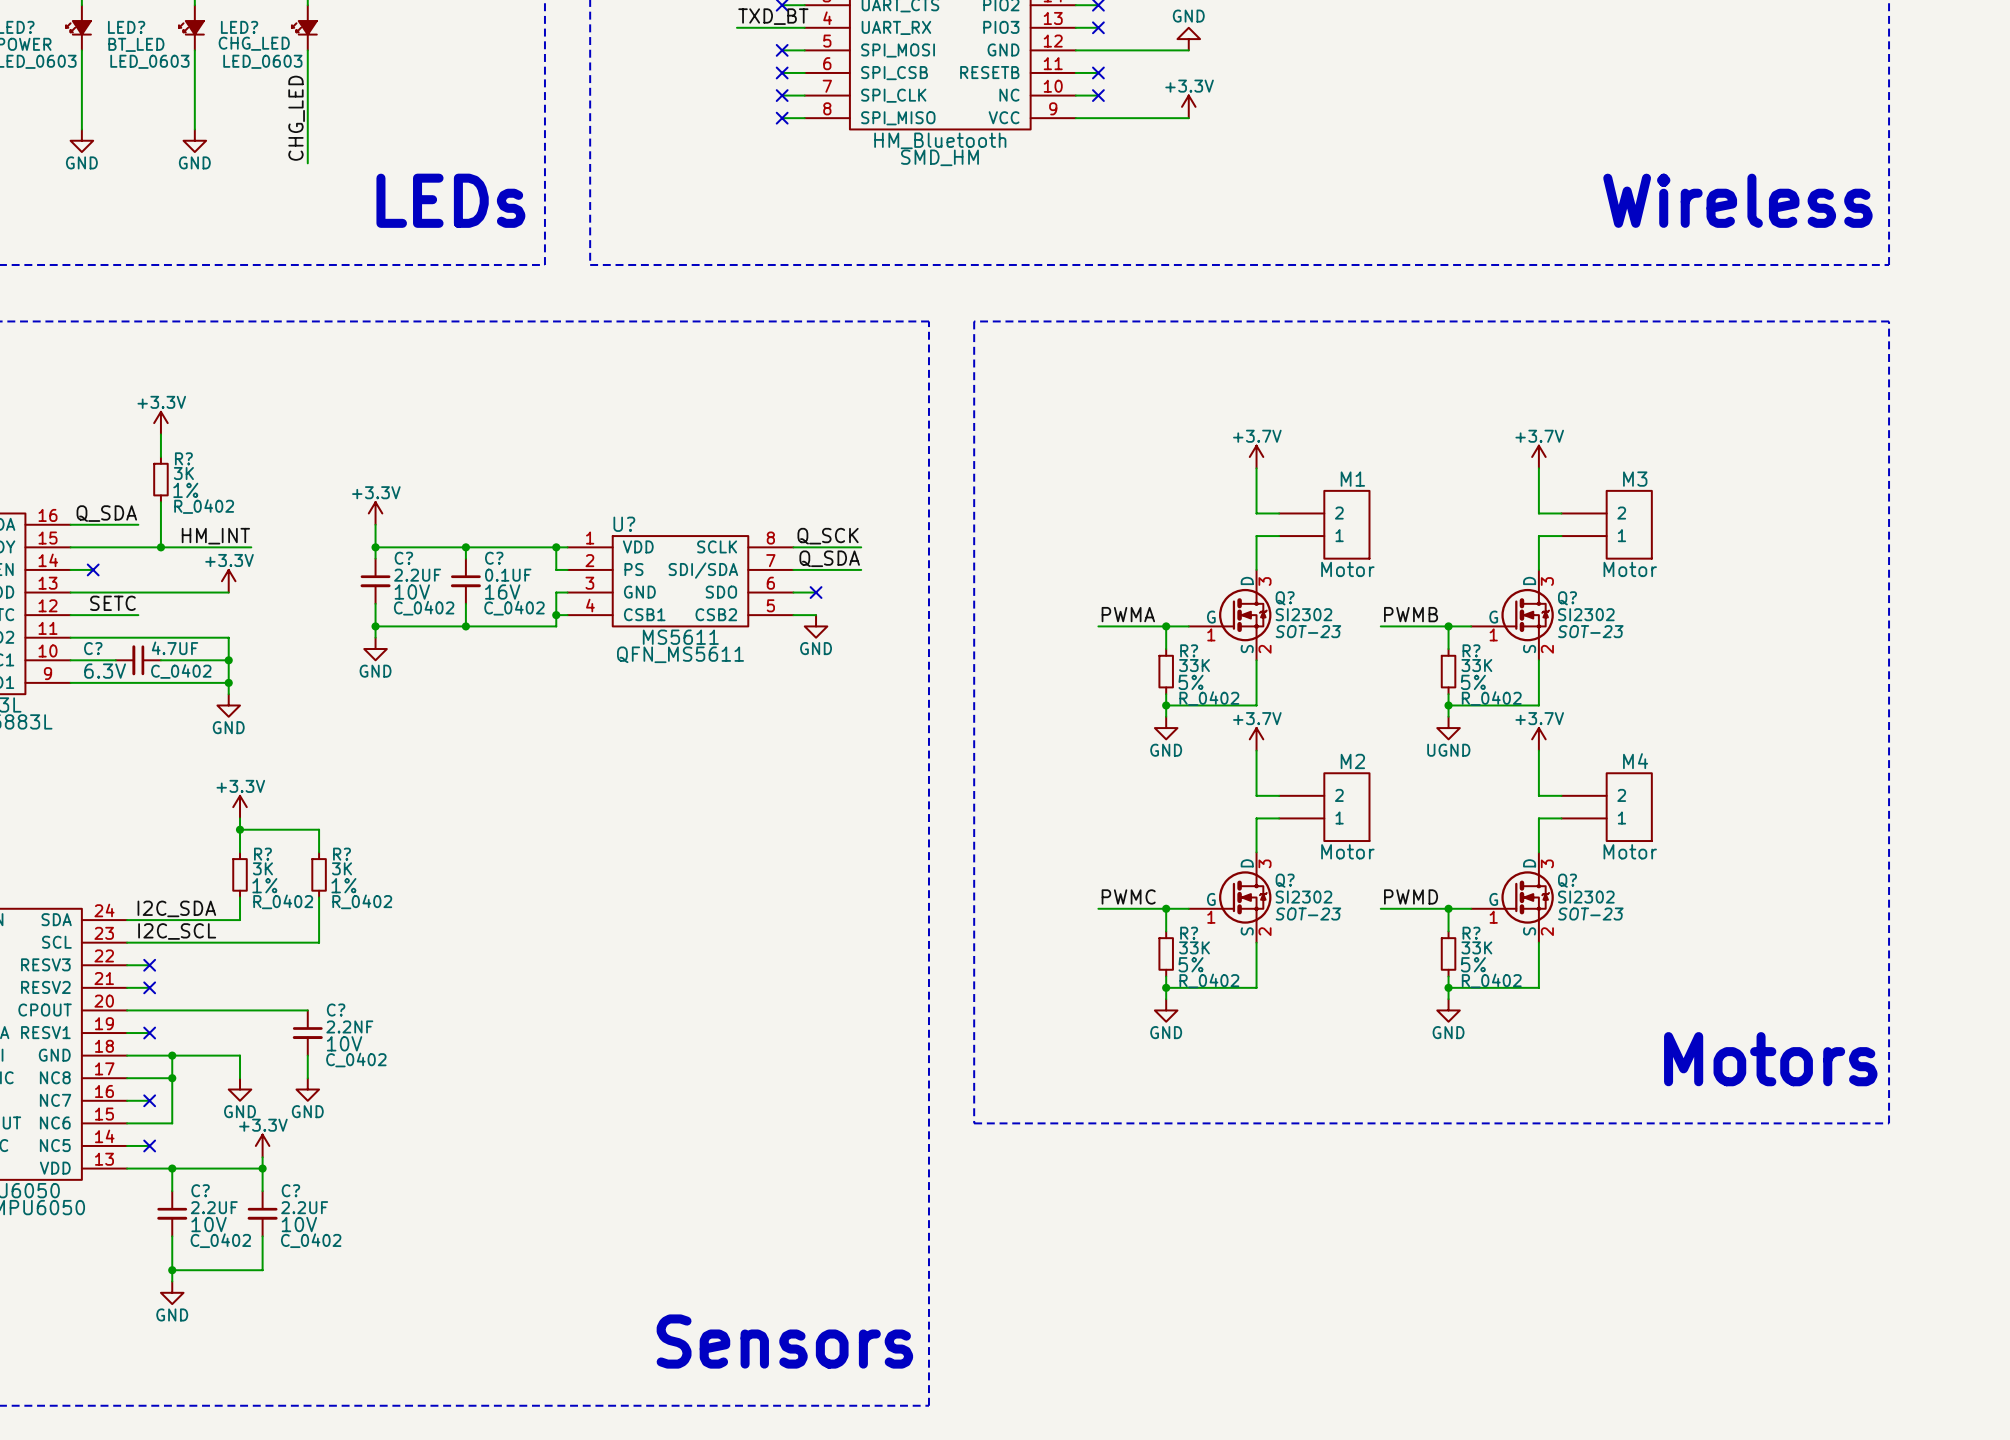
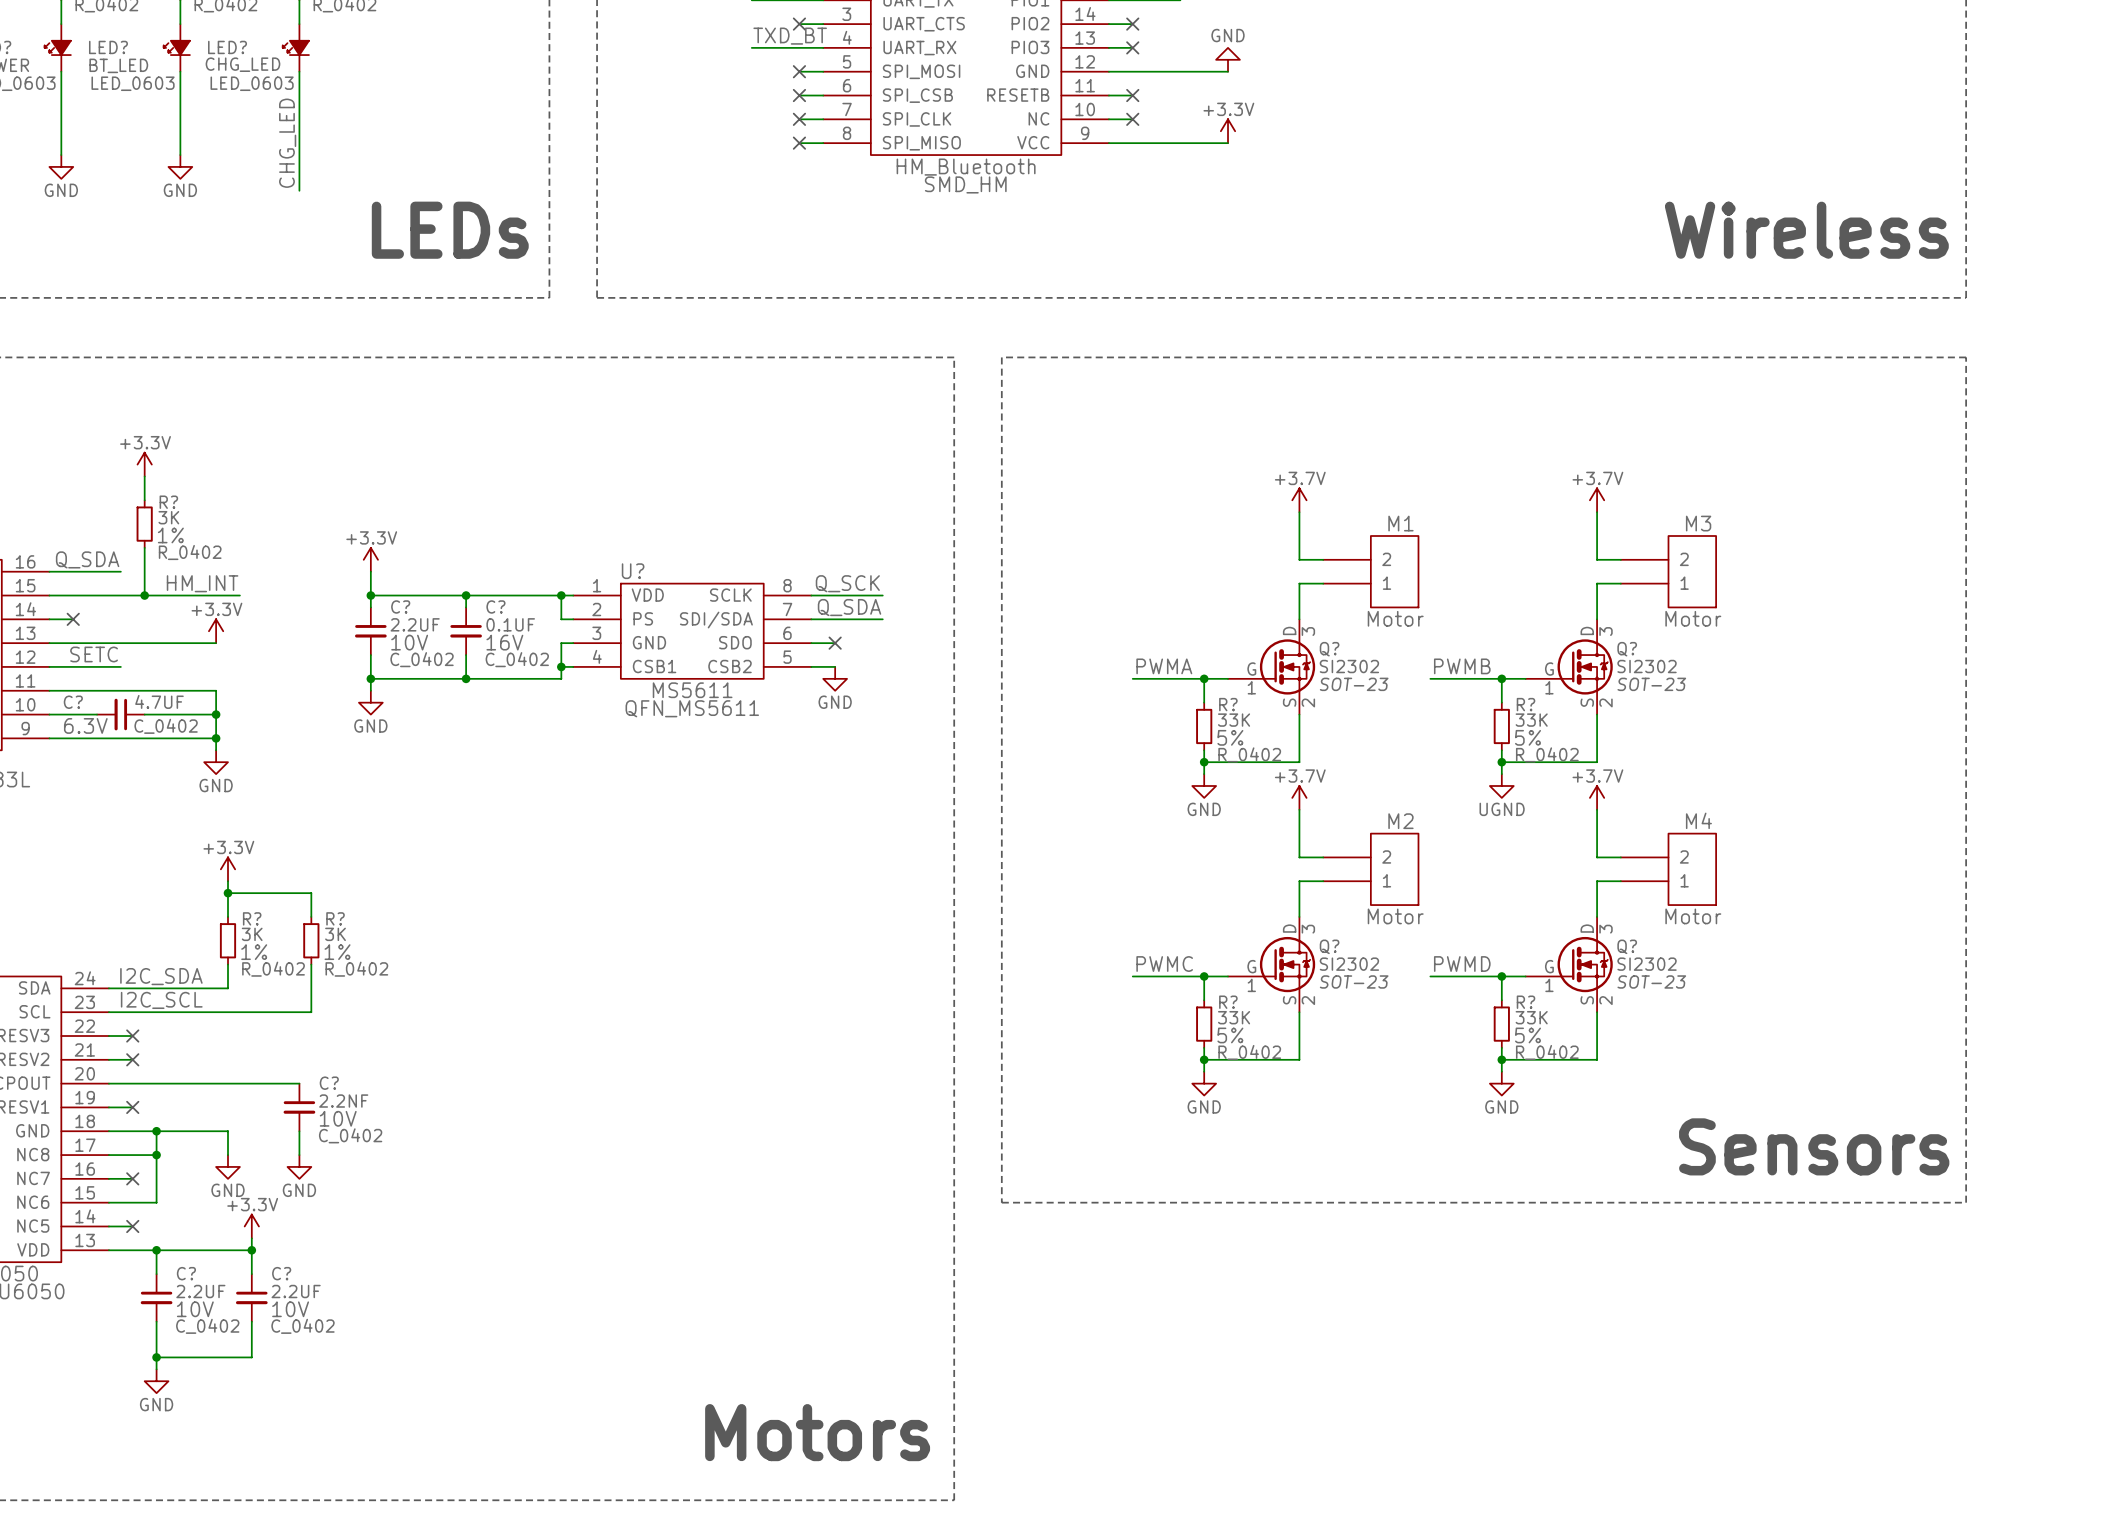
text: Motors (1770, 1059) -> none
text: none -> Sensors (1814, 1146)
text: Sensors (784, 1341) -> none
text: none -> Motors (817, 1432)

